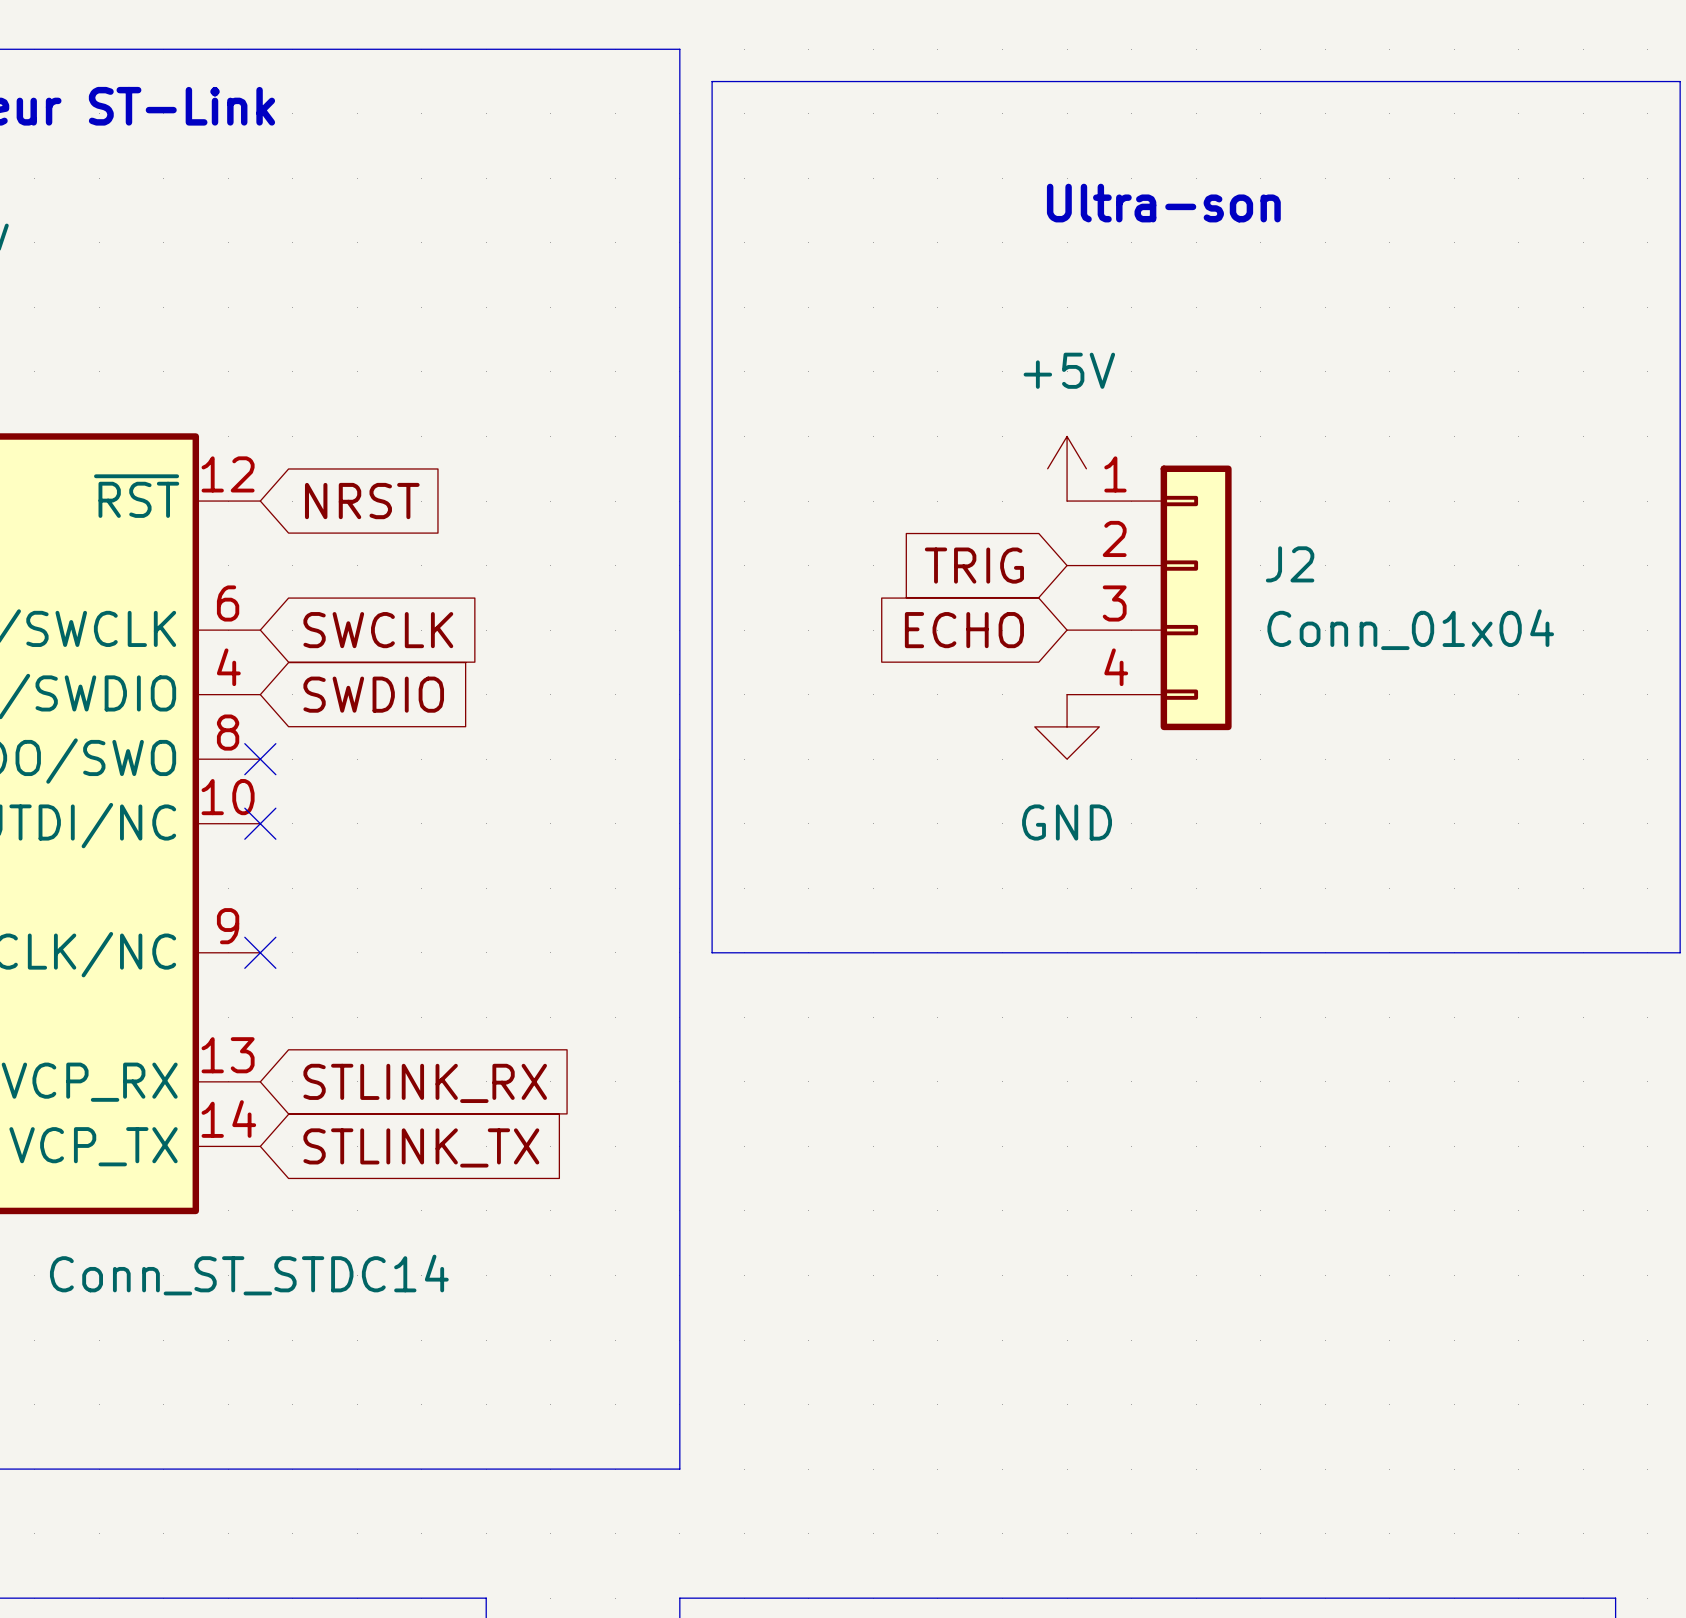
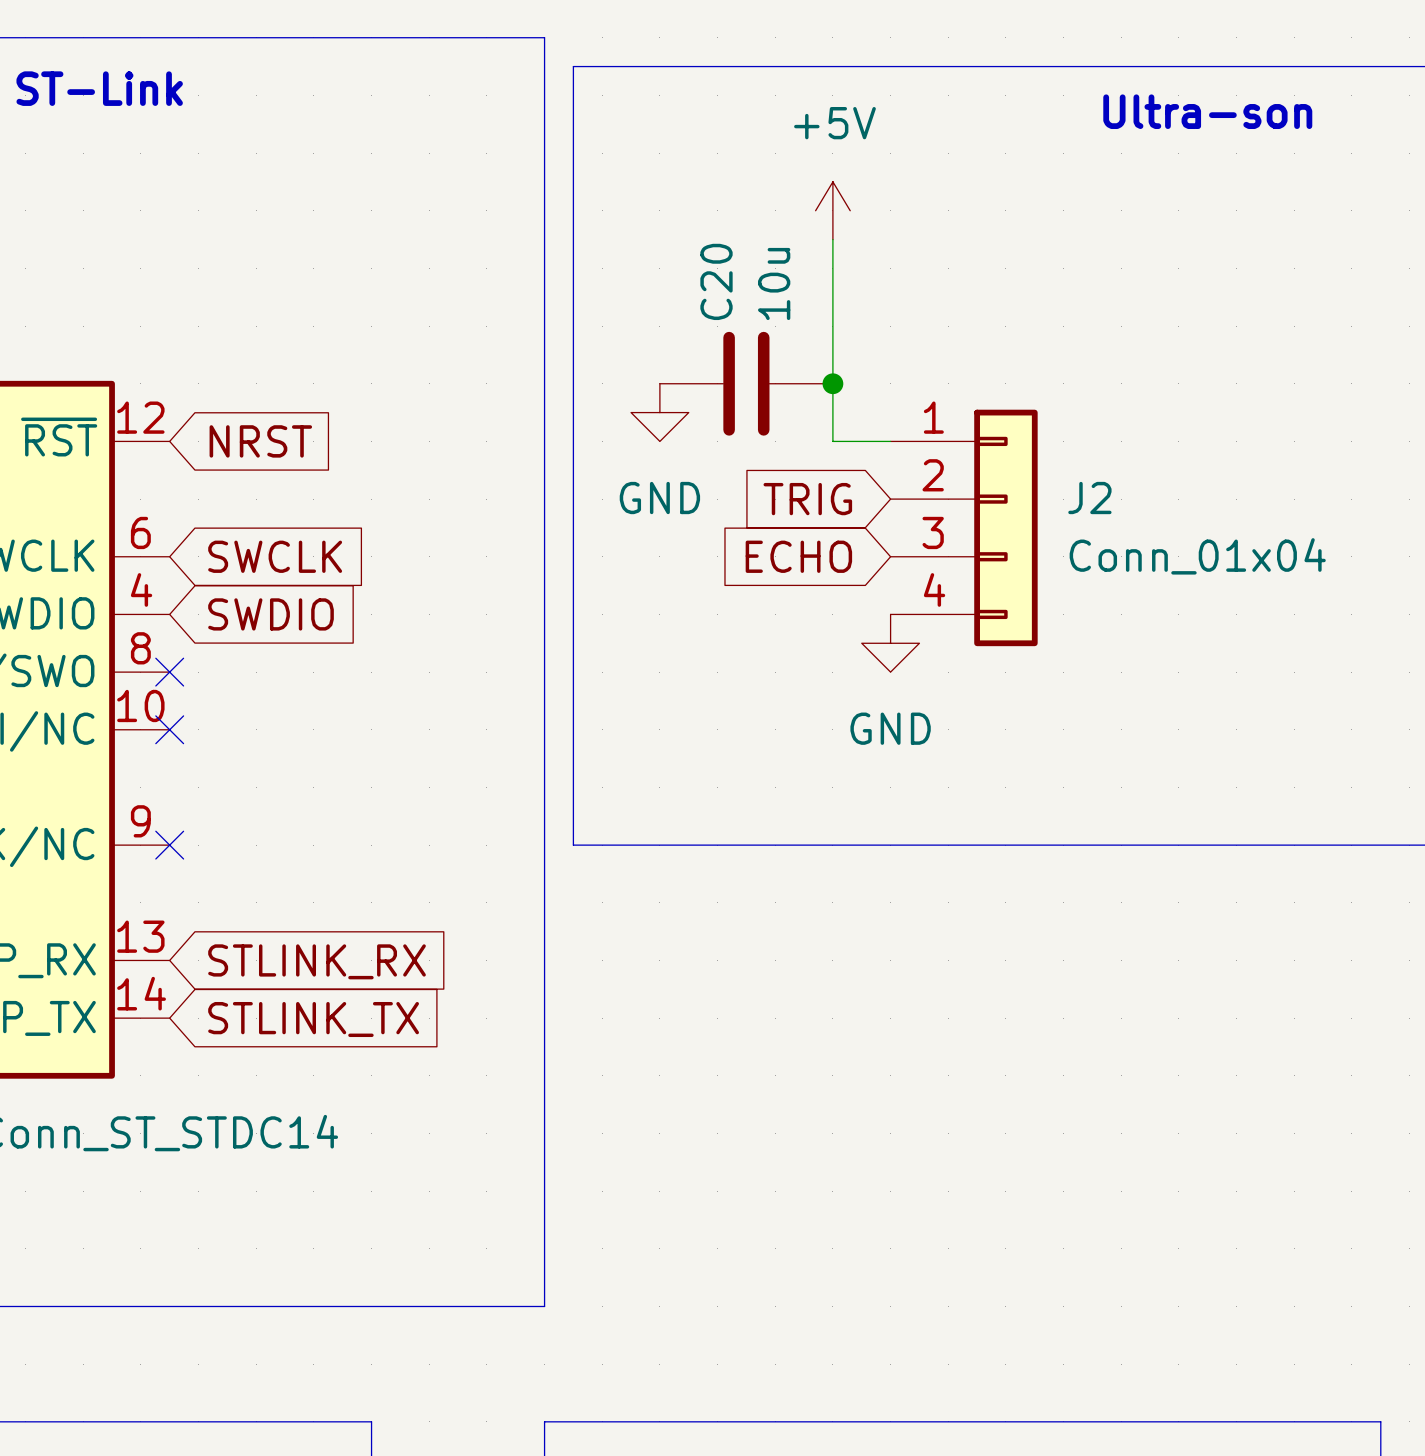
text position: Ultra-son (1163, 203) -> Ultra-son (1207, 111)
wire: none -> (832, 239) (832, 441) (890, 441)
C20: none -> 10u (746, 383)
junction: none -> (832, 383)
power symbol: none -> GND (659, 412)
power symbol position: +5V (1067, 468) -> +5V (832, 210)

